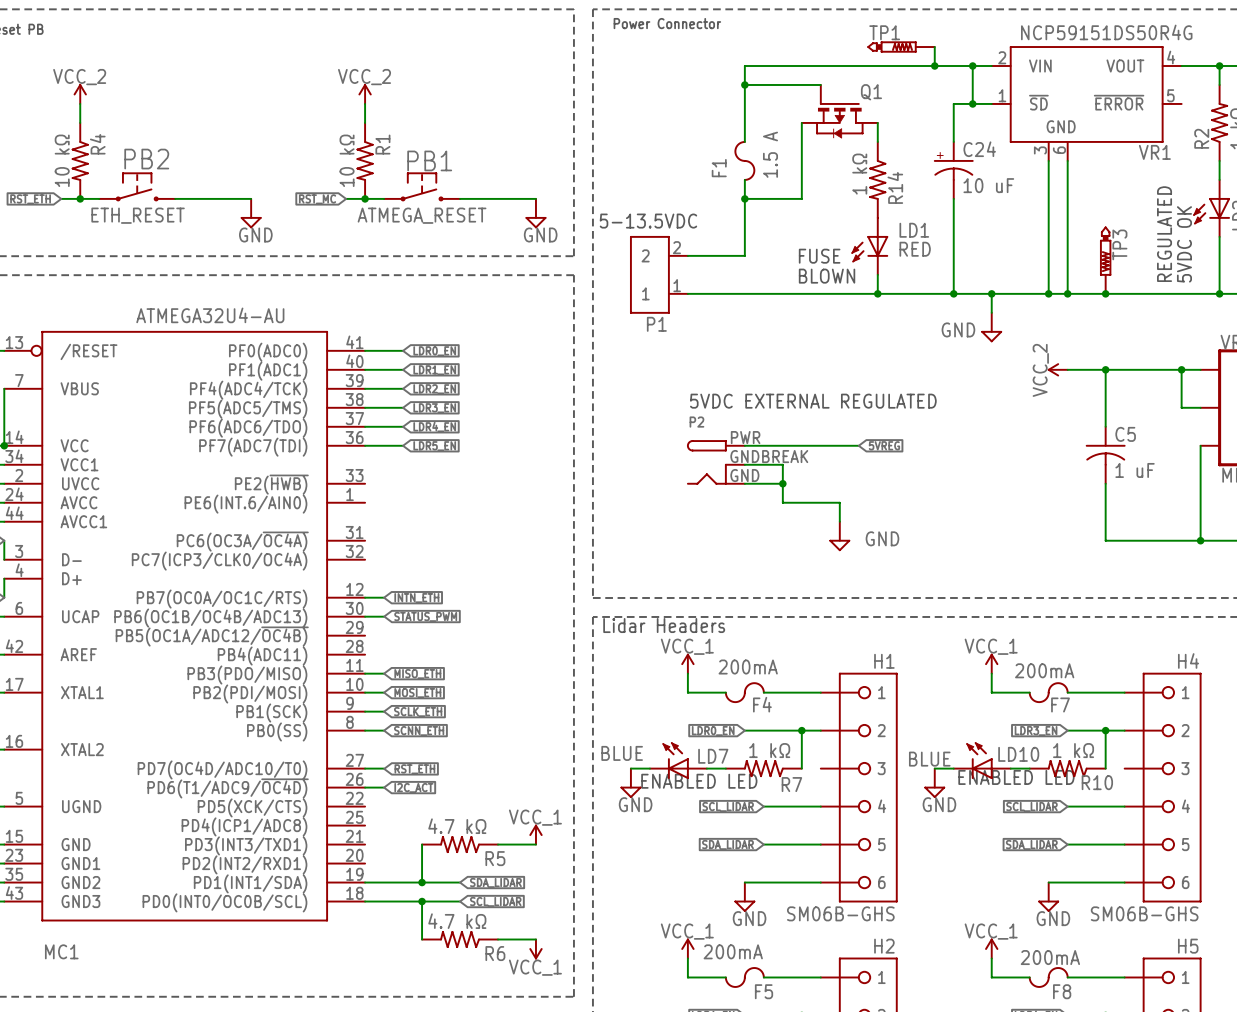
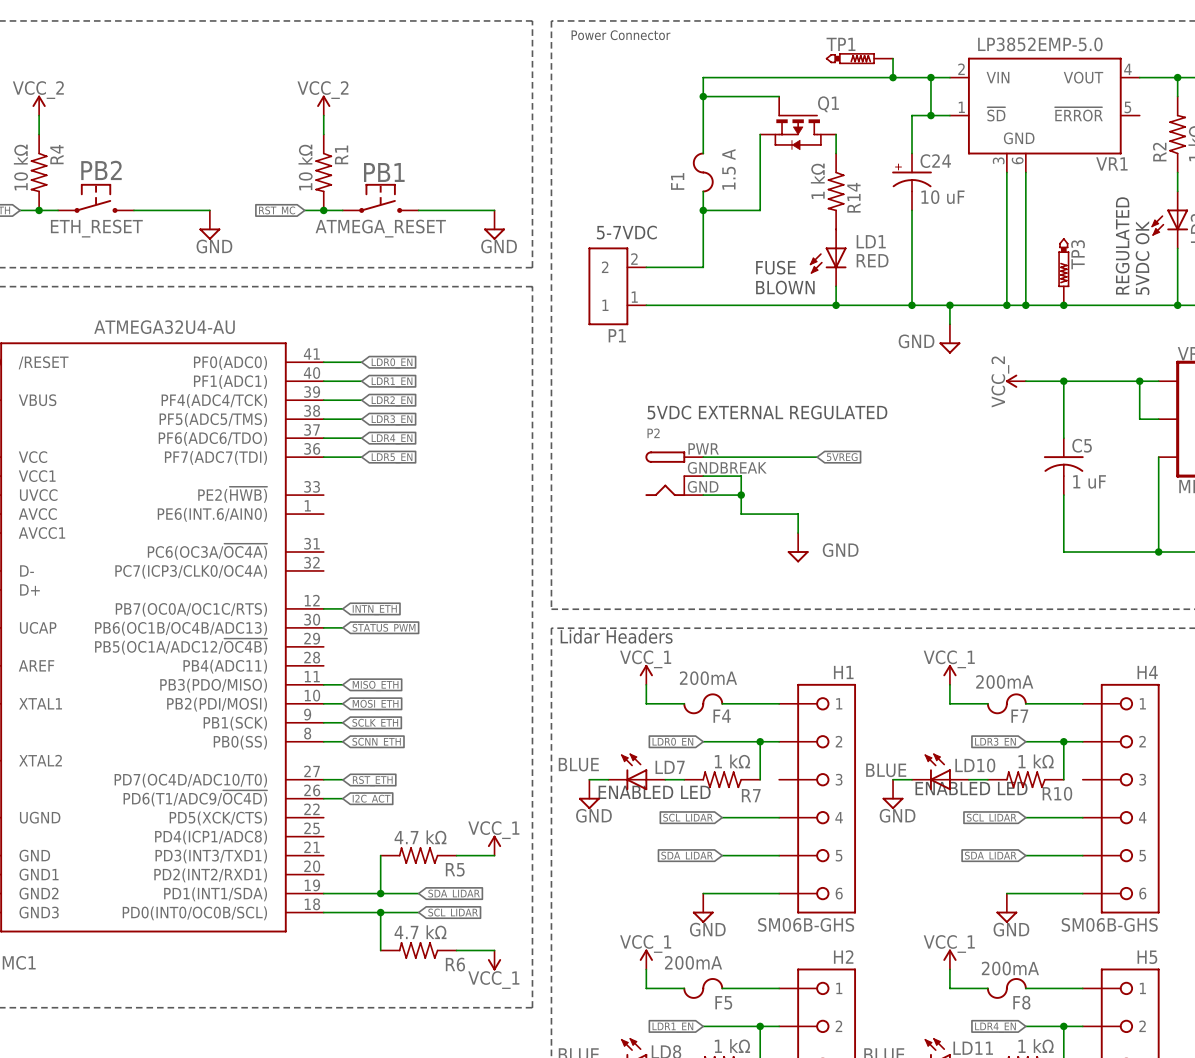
VR1 value: NCP59151DS50R4G (1106, 32) -> LP3852EMP-5.0 (1040, 44)
text: 5-13.5VDC (648, 221) -> 5-7VDC (626, 232)

